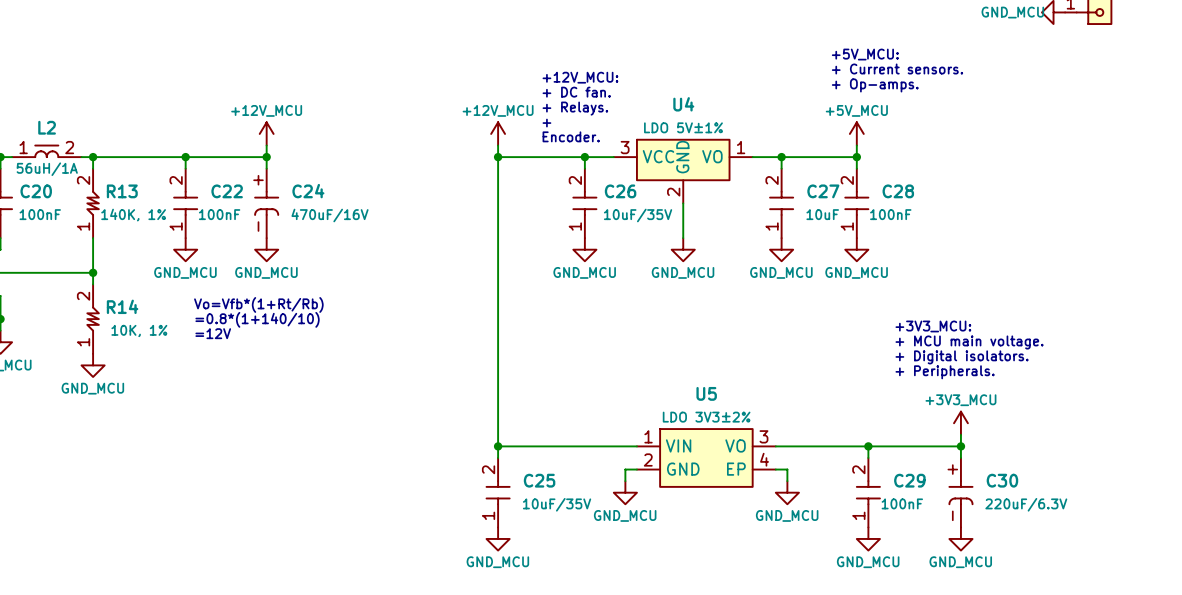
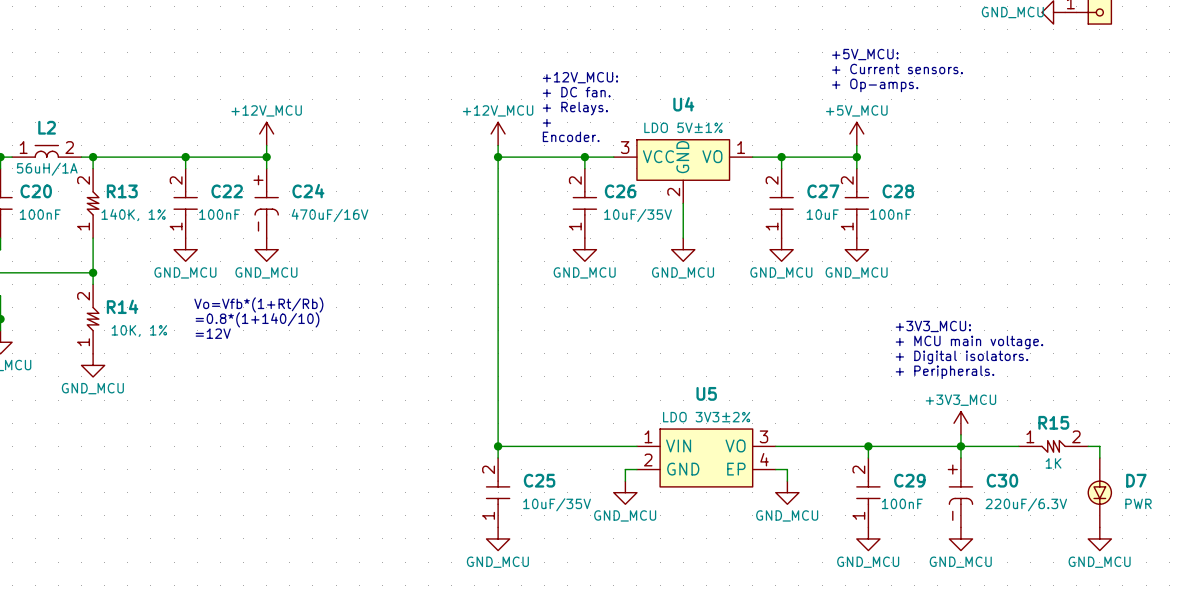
wire: none -> (960, 446) (1018, 446)
R15: none -> 1K (1053, 446)
wire: none -> (1088, 446) (1099, 446) (1099, 457)
D7: none -> PWR (1099, 492)
power symbol: none -> GND_MCU (1099, 538)

